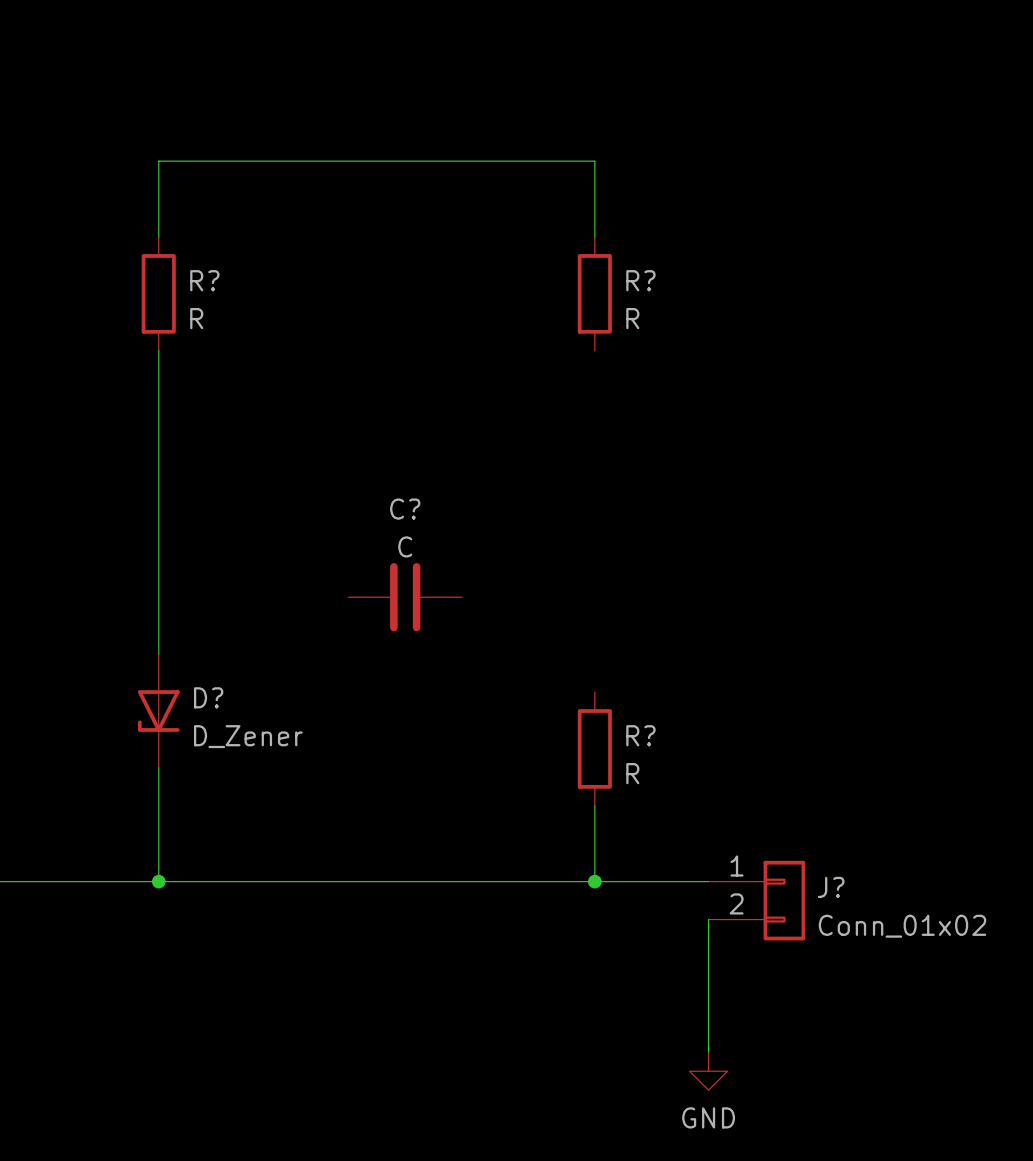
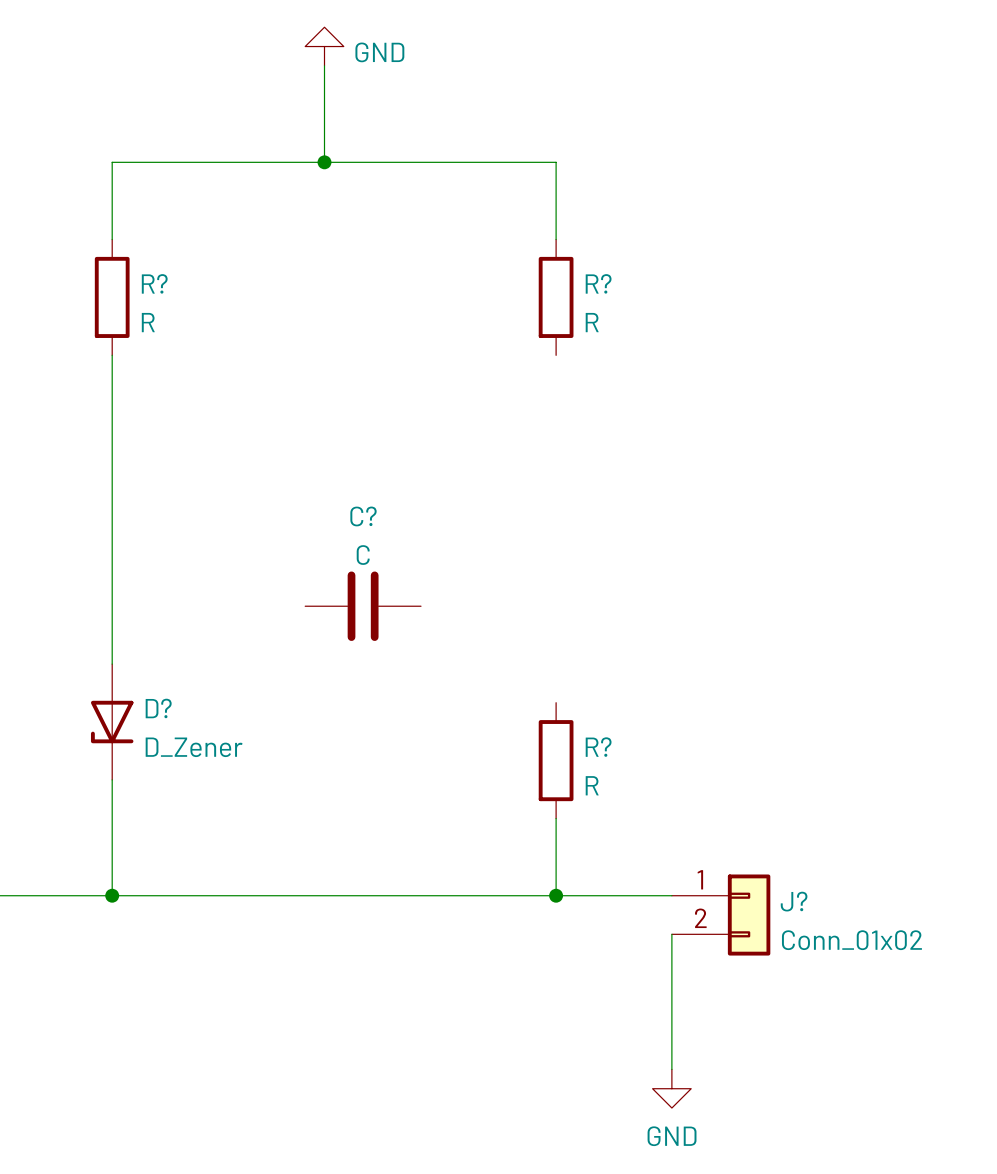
power symbol: none -> GND (324, 46)
wire: none -> (324, 65) (324, 162)
junction: none -> (324, 162)

